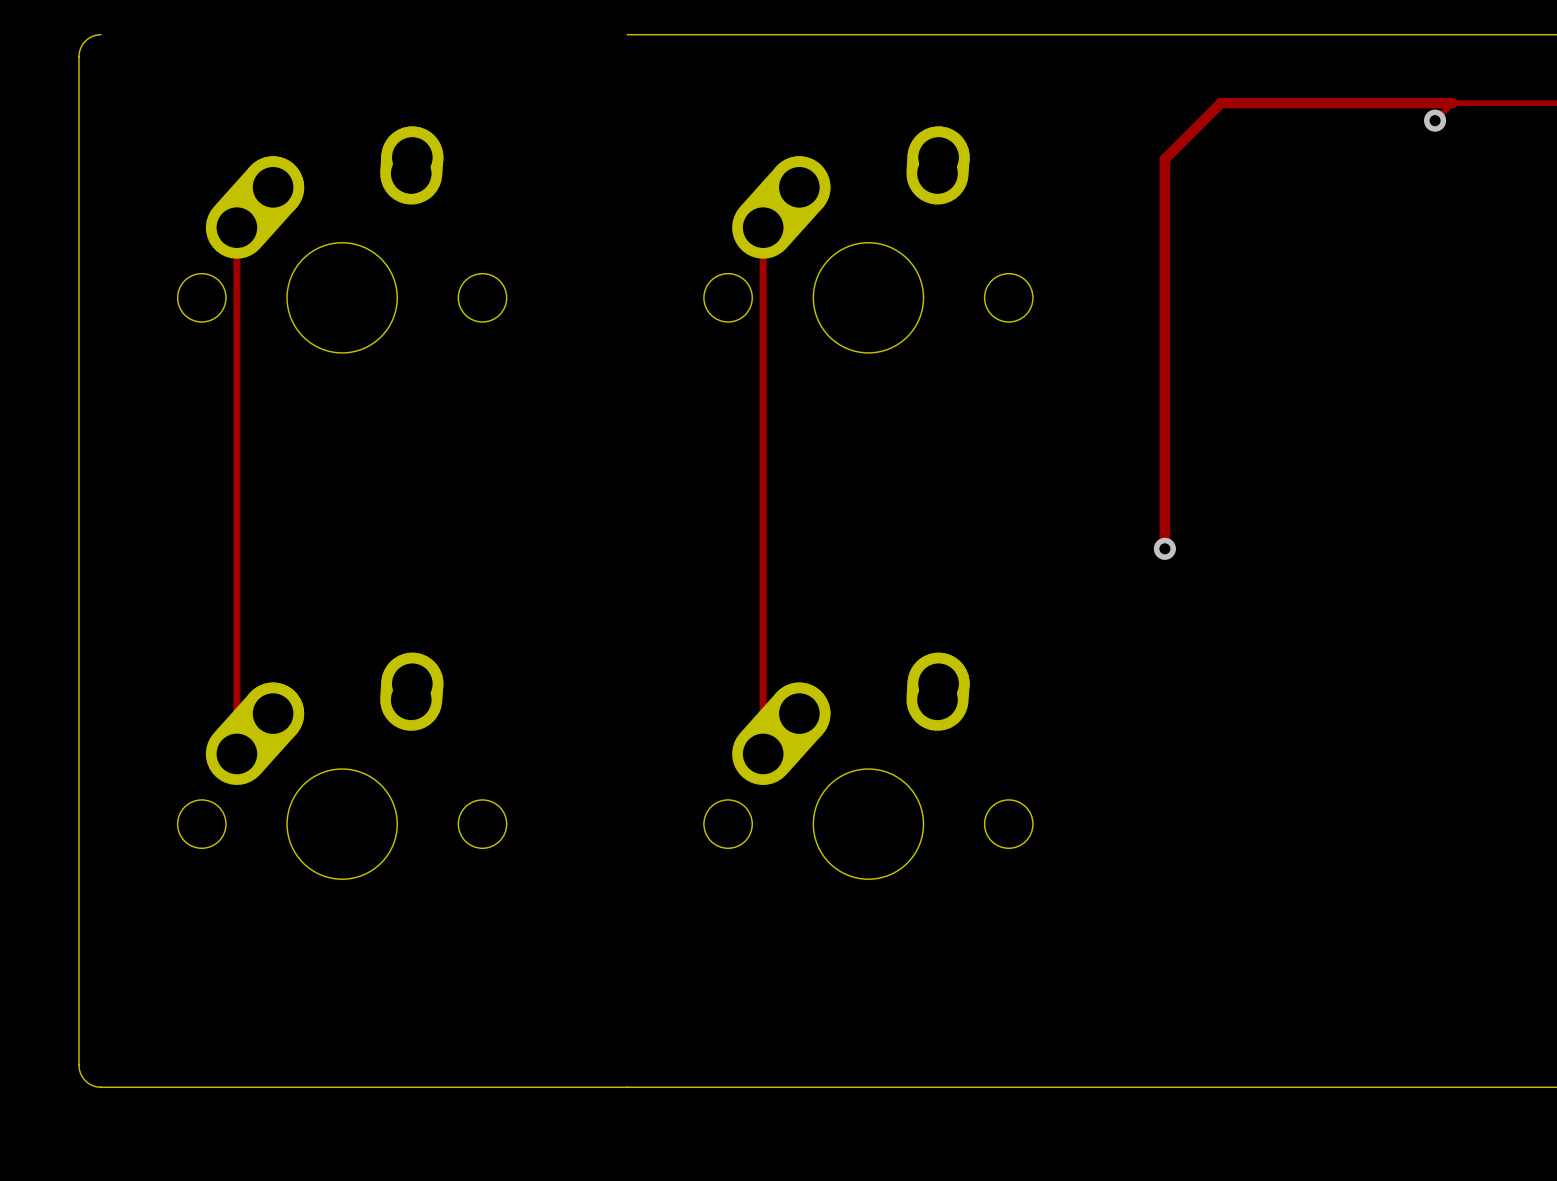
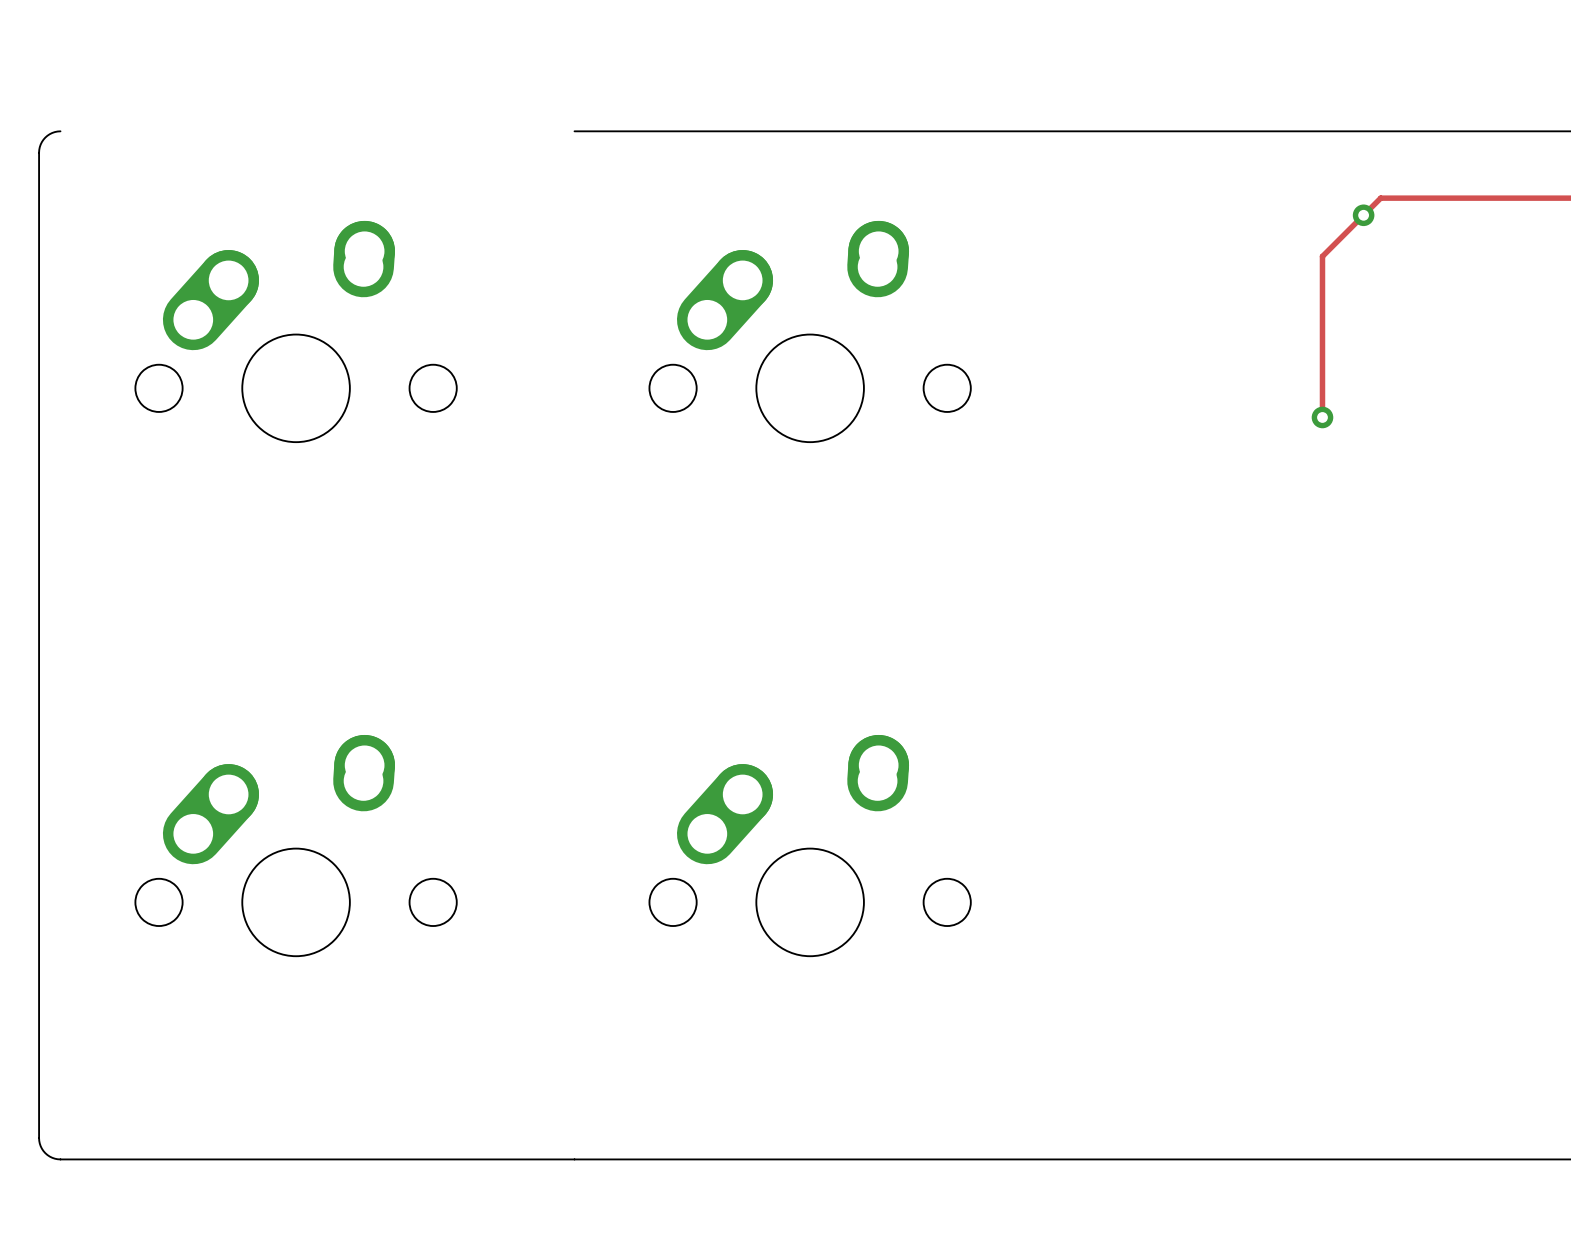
track: (1452, 103) (1221, 103) (1164, 159) (1164, 548) -> none
track: none -> (1363, 215) (1322, 256) (1322, 417)
track: (236, 227) (236, 753) -> none
track: (763, 227) (763, 753) -> none
via: none -> (1322, 417)
via: (1164, 548) -> none

